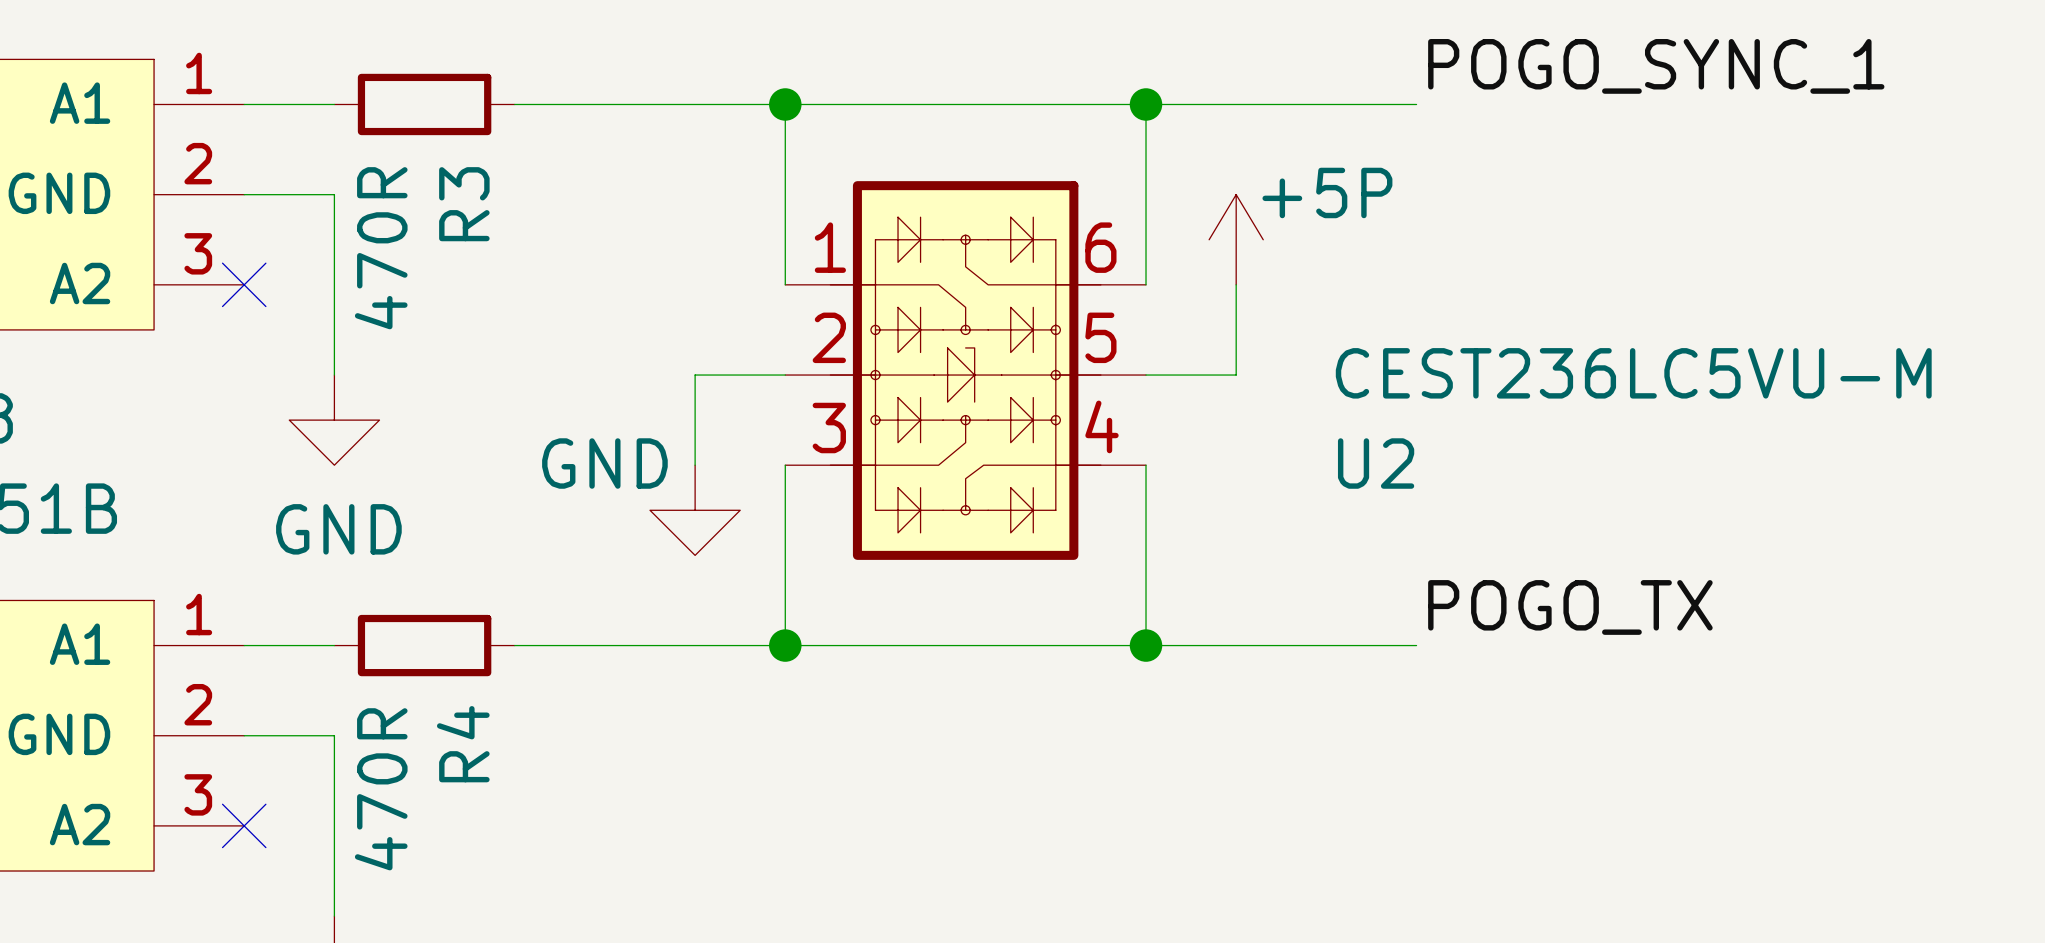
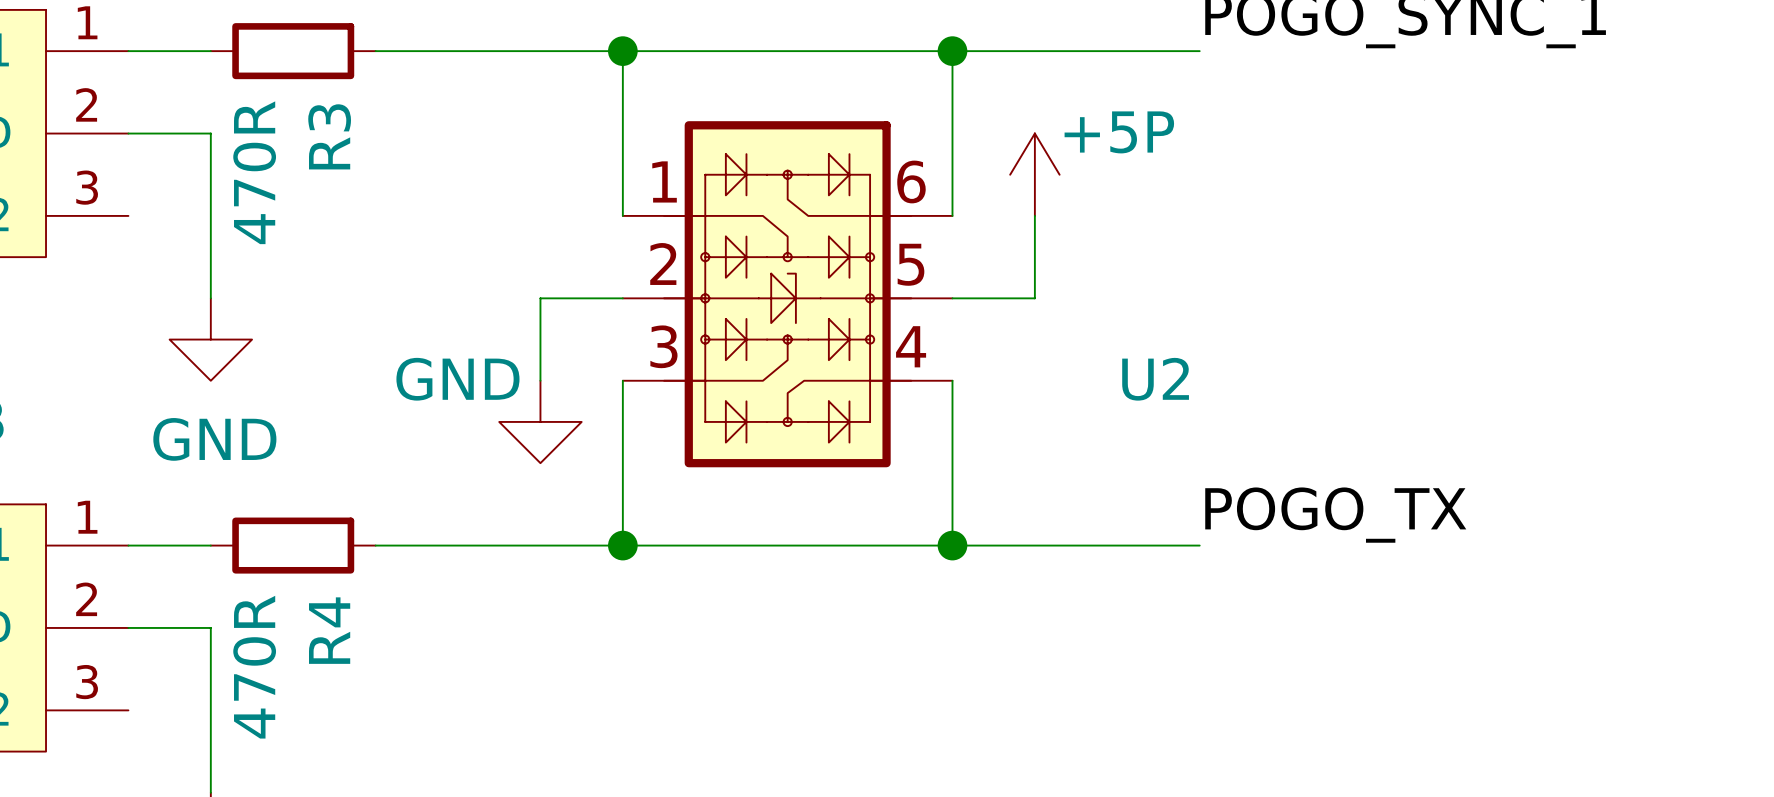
no-connect mark: (244, 284) -> none
U2 value: CEST236LC5VU-M (1633, 373) -> none
no-connect mark: (244, 825) -> none

